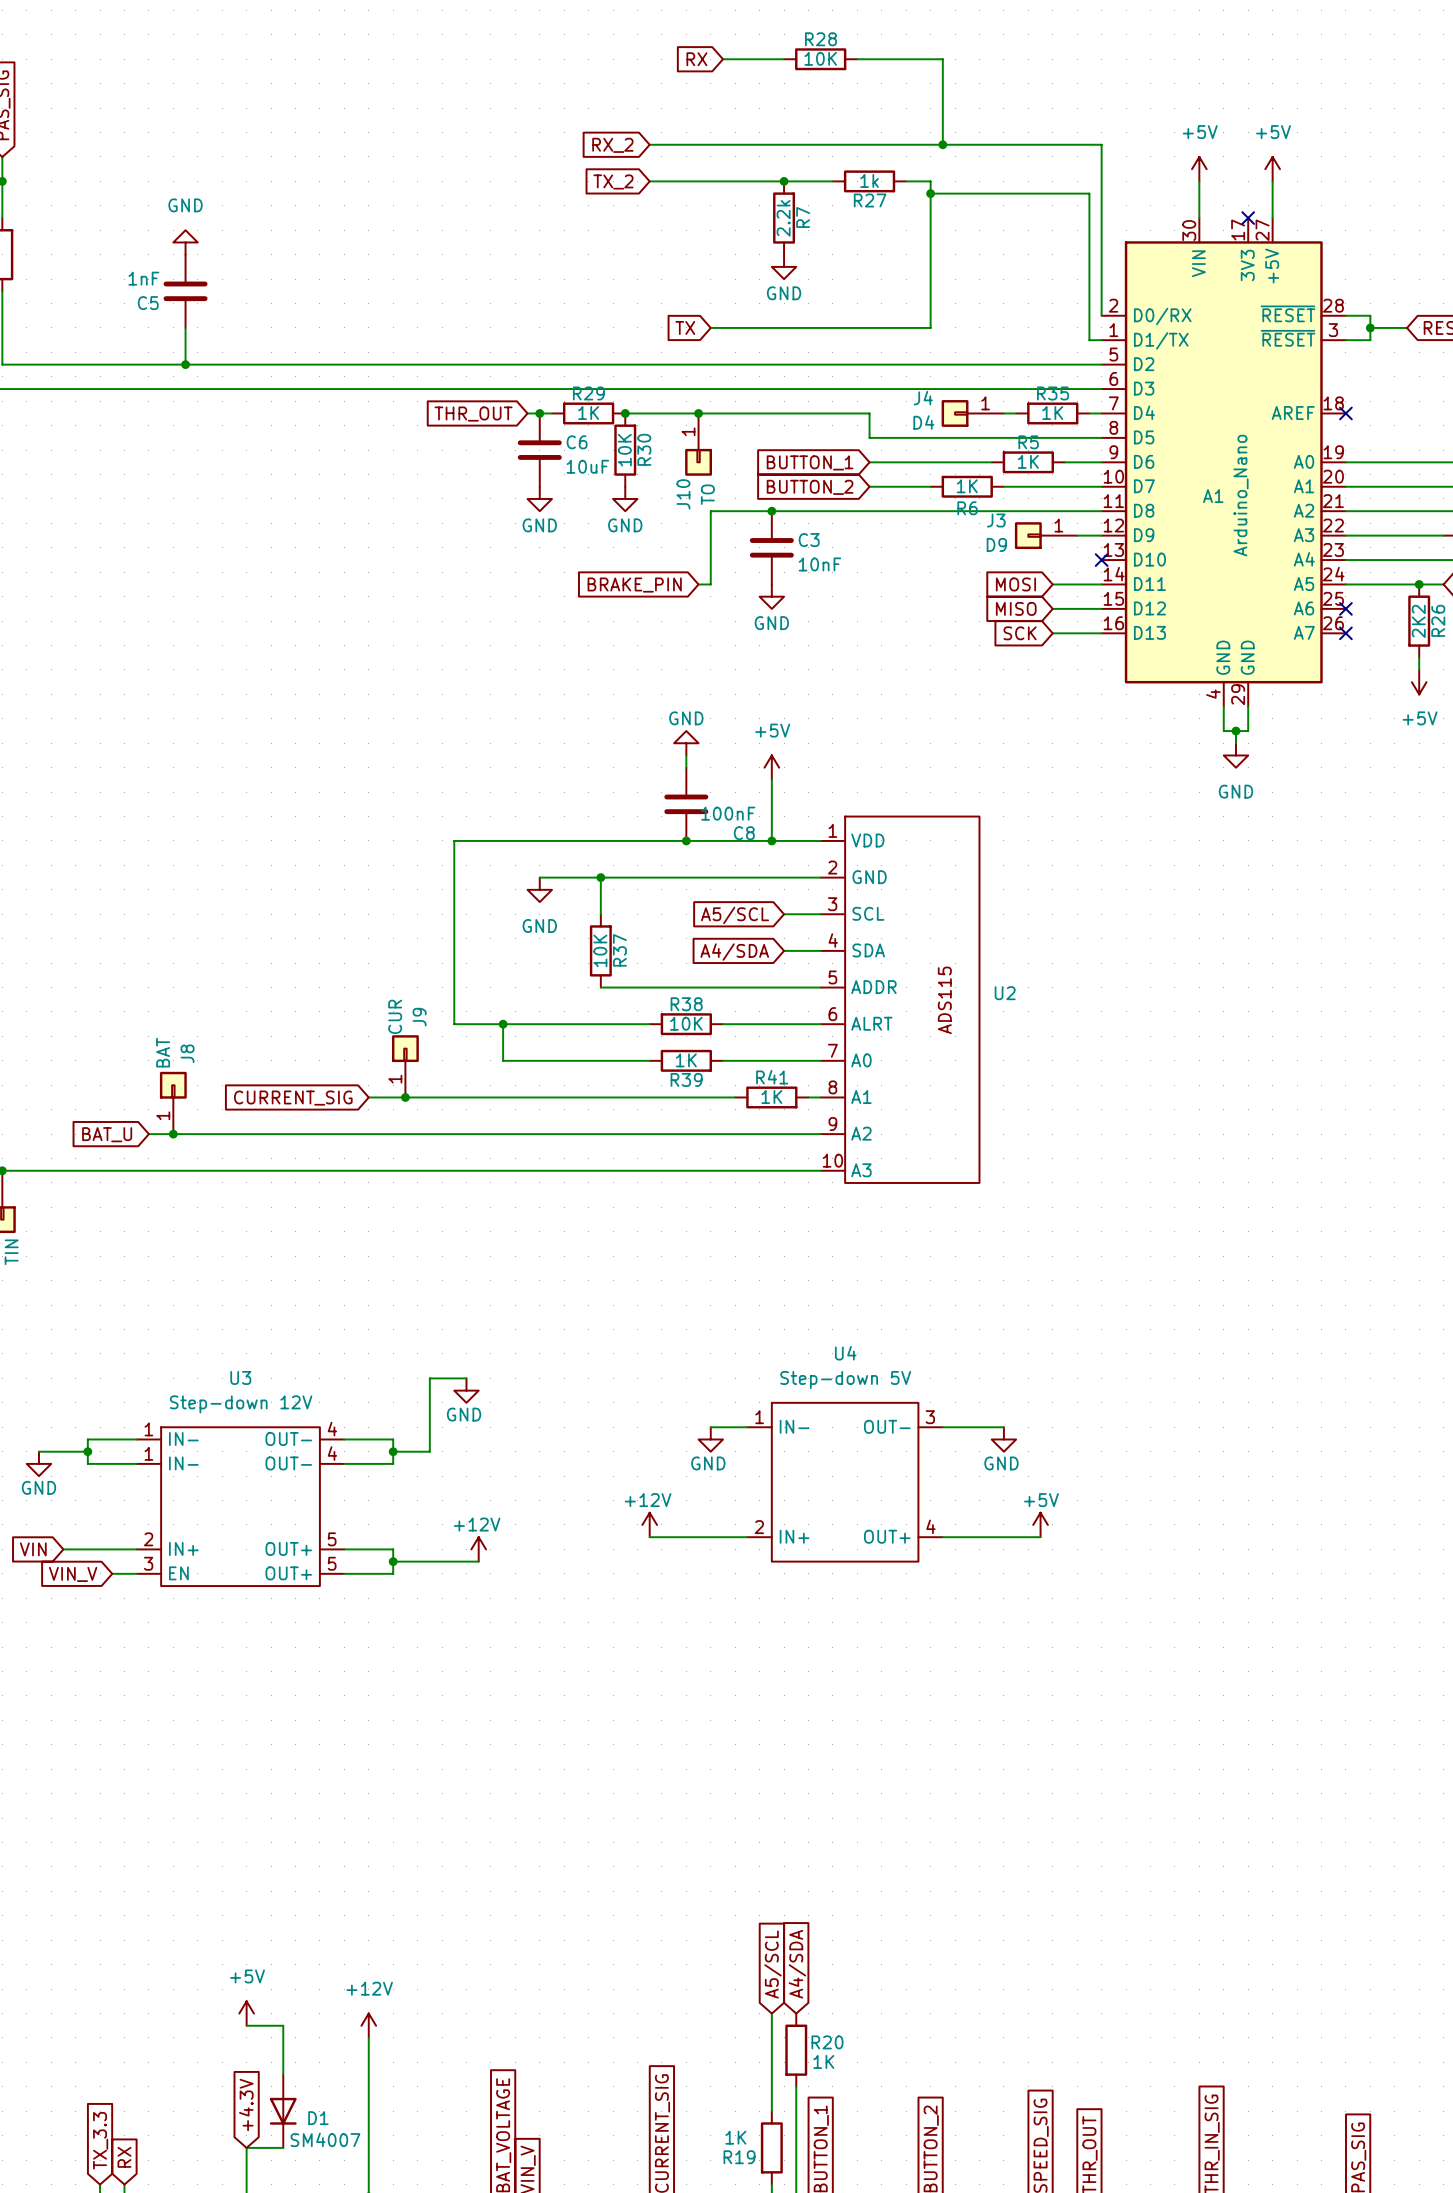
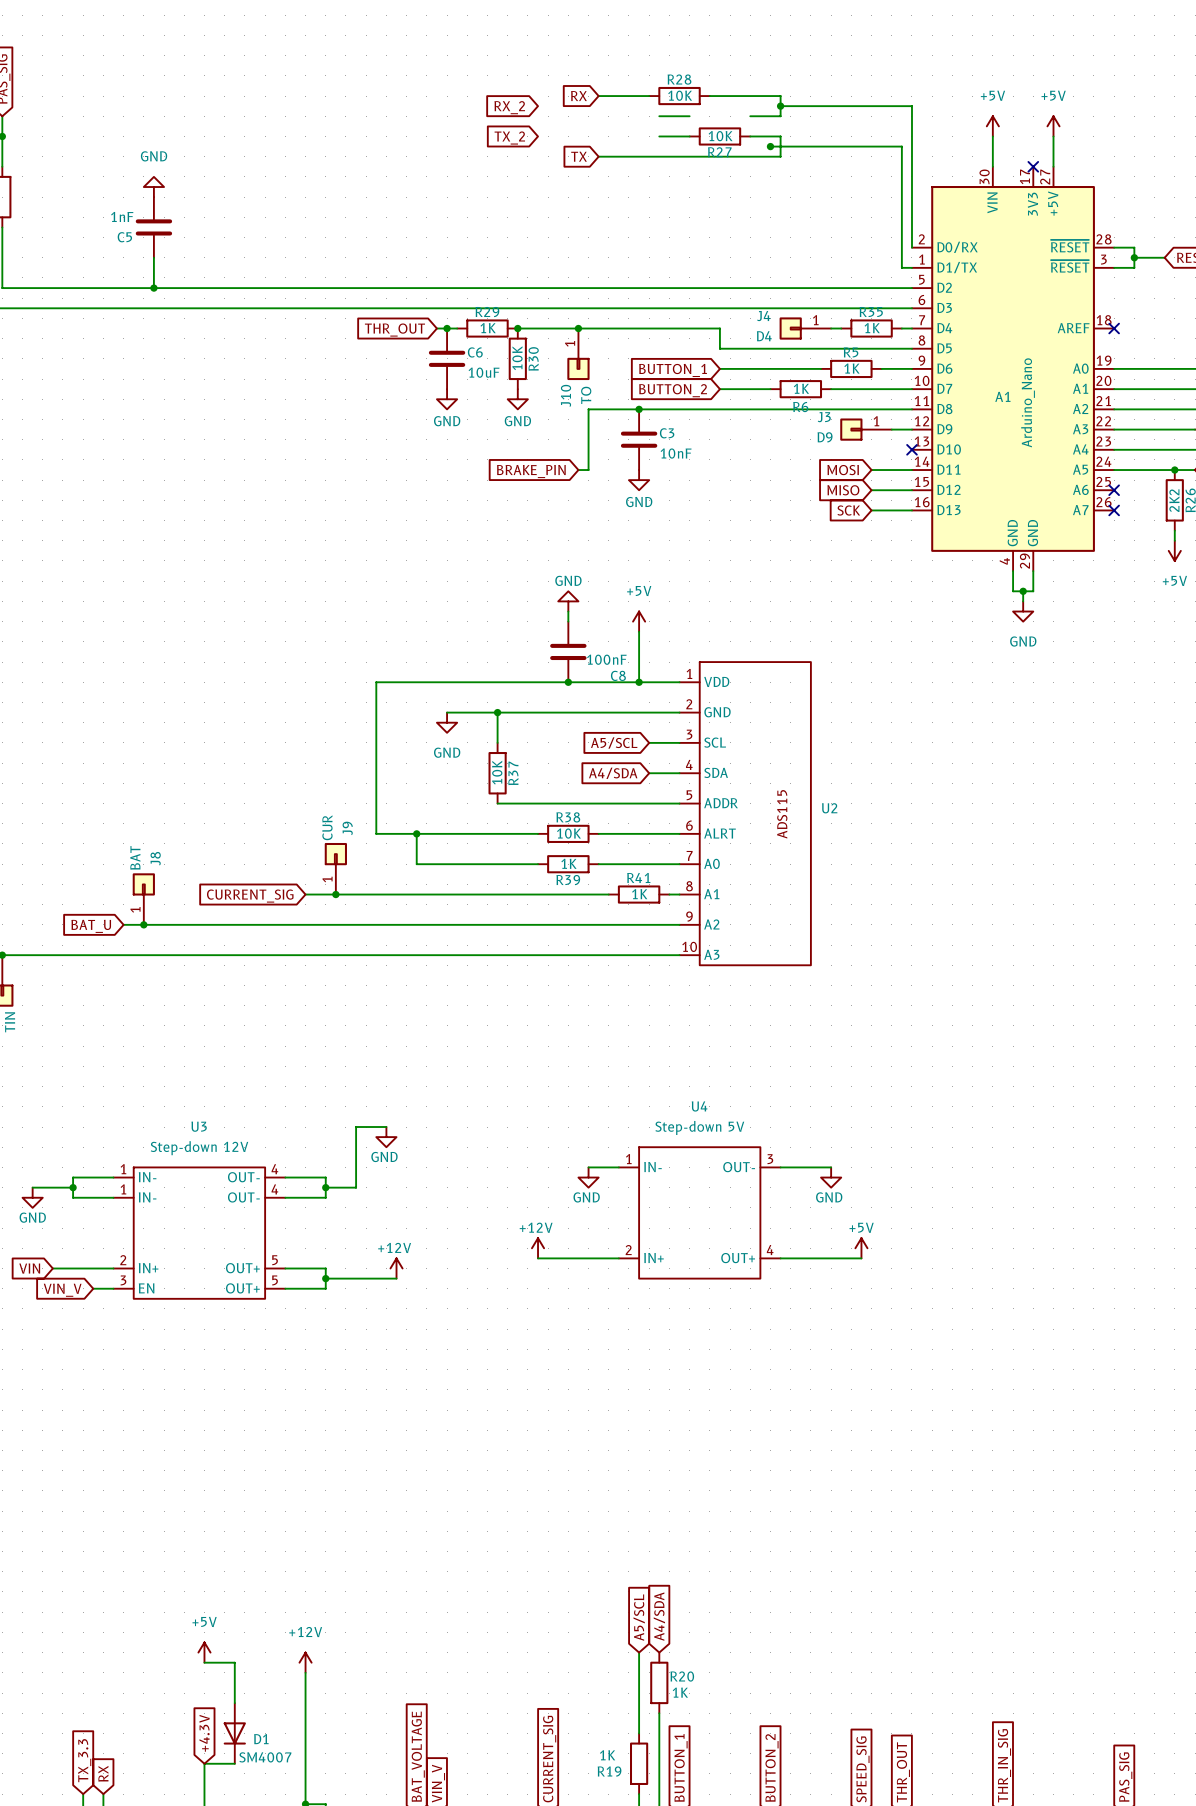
global label position: RX (696, 59) -> RX (578, 96)
wire: (722, 59) (784, 59) -> (598, 96) (649, 96)
R28 position: (820, 59) -> (679, 96)
wire: (857, 59) (942, 59) (942, 132) -> (709, 96) (780, 96)
wire: (649, 144) (942, 144) -> (750, 116) (780, 116) (780, 106)
wire: none -> (659, 116) (689, 116)
R27 value: 1k (869, 180) -> 10K (720, 136)
wire: (649, 181) (796, 181) -> none
junction: (784, 181) -> none
wire: (930, 181) (930, 327) (710, 327) -> (770, 136) (780, 136) (780, 156) (598, 156)
R7: 2.2k (784, 218) -> none
power symbol: GND (784, 266) -> none
global label position: TX (685, 327) -> TX (579, 156)

